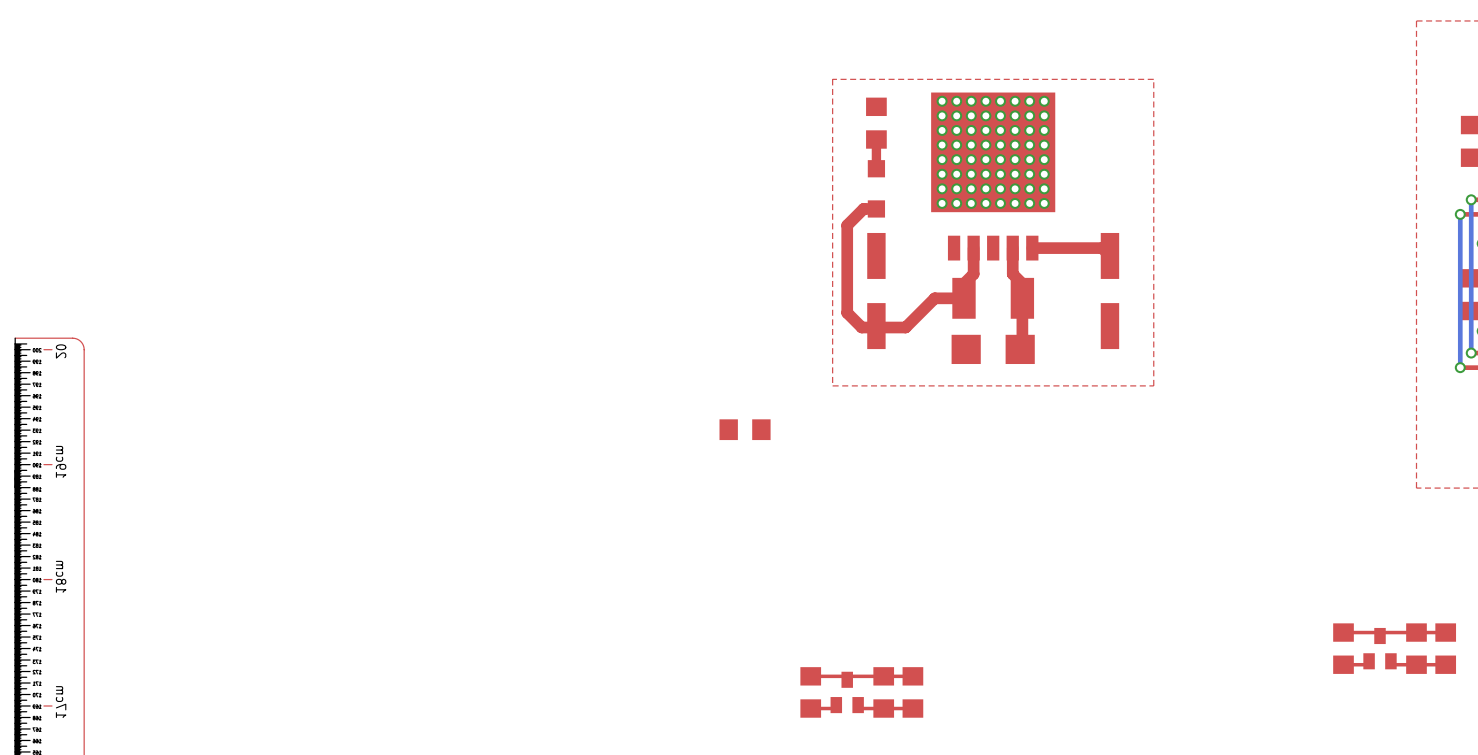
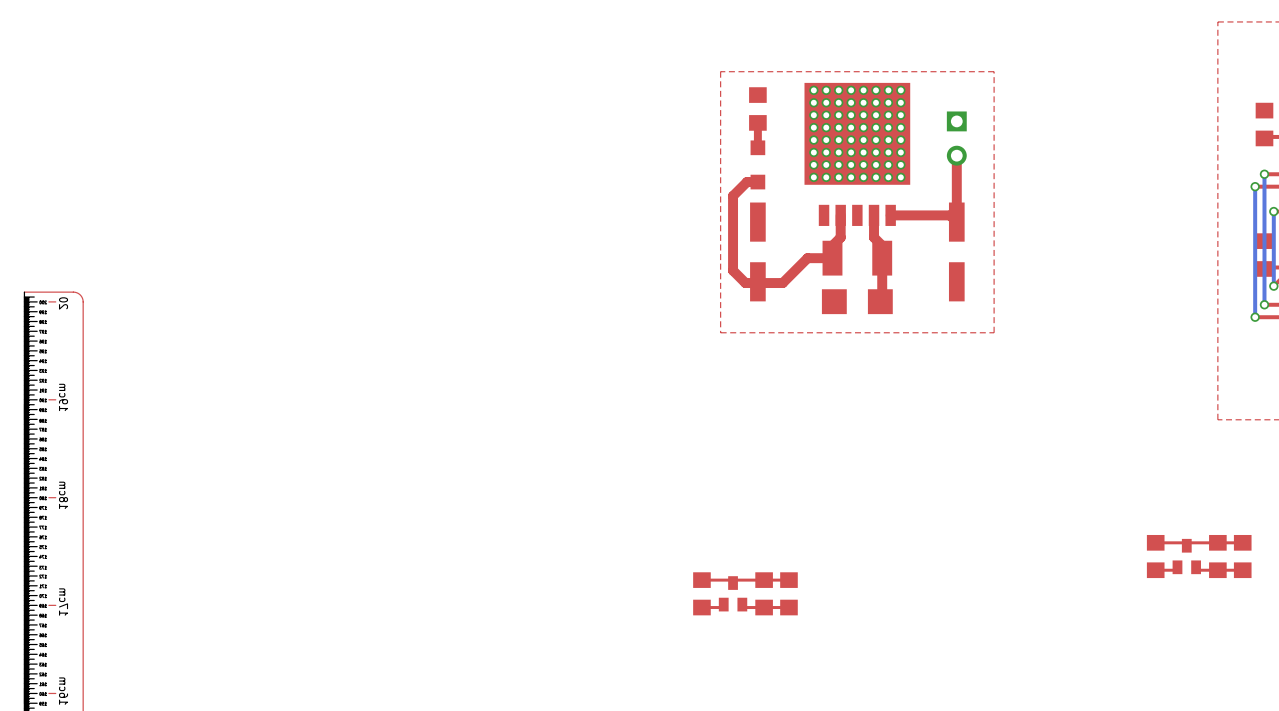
part: none -> (956, 138)
top track: none -> (956, 155) (956, 222)
part: (745, 429) -> none

